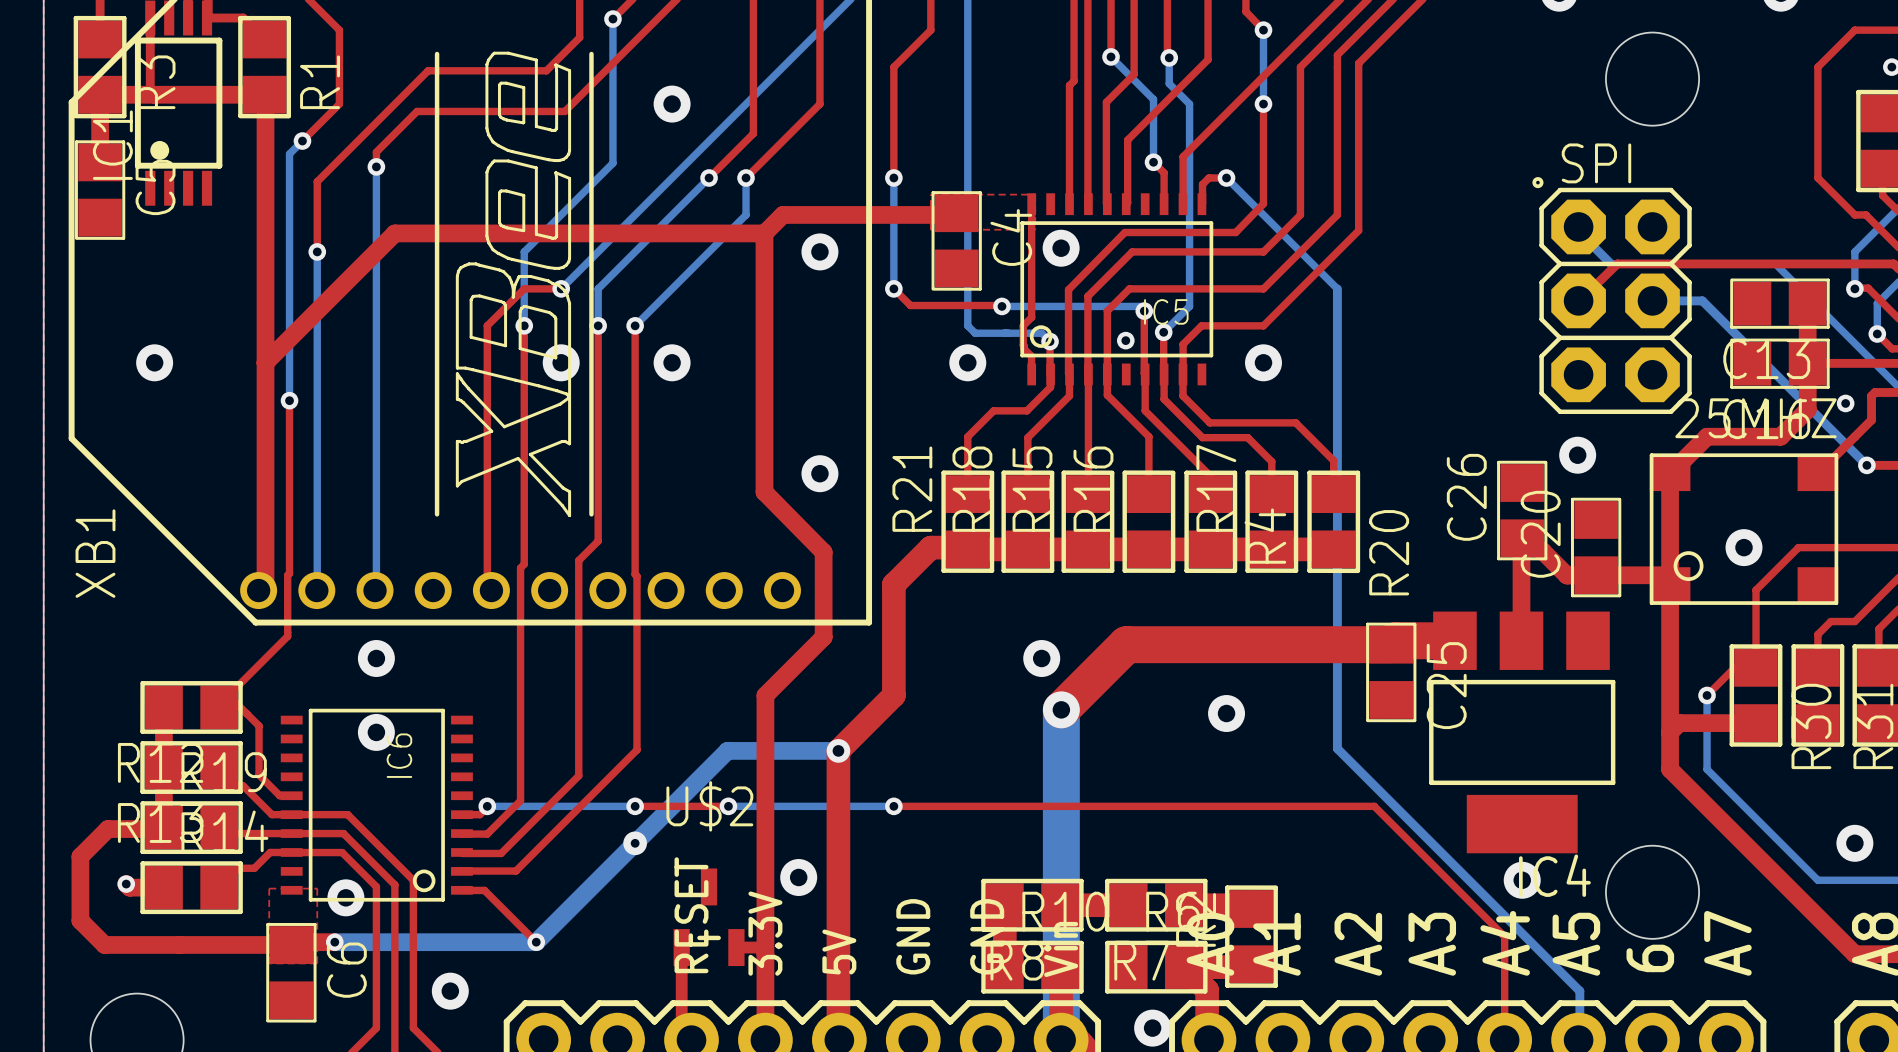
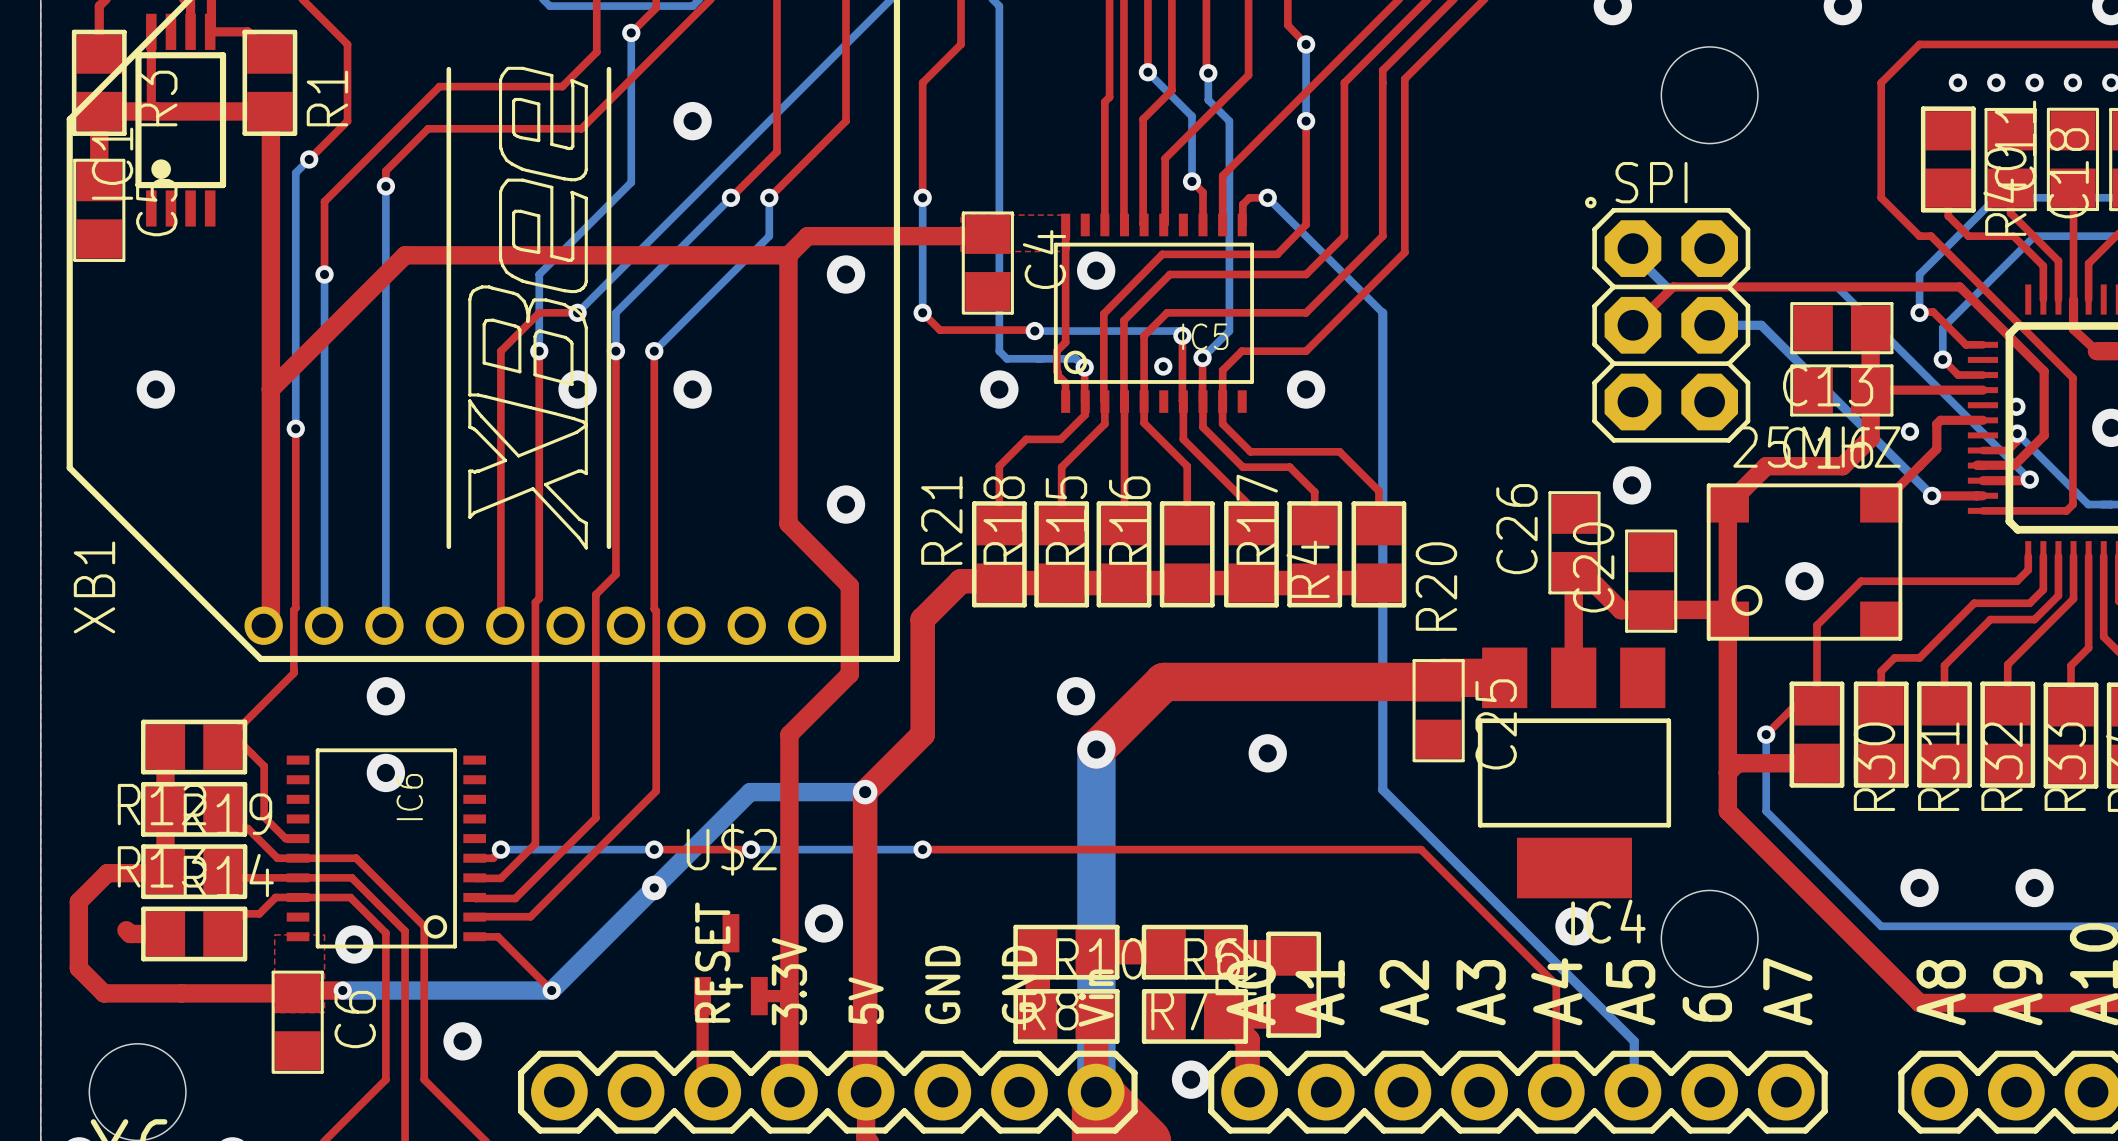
via: (126, 884) -> none

